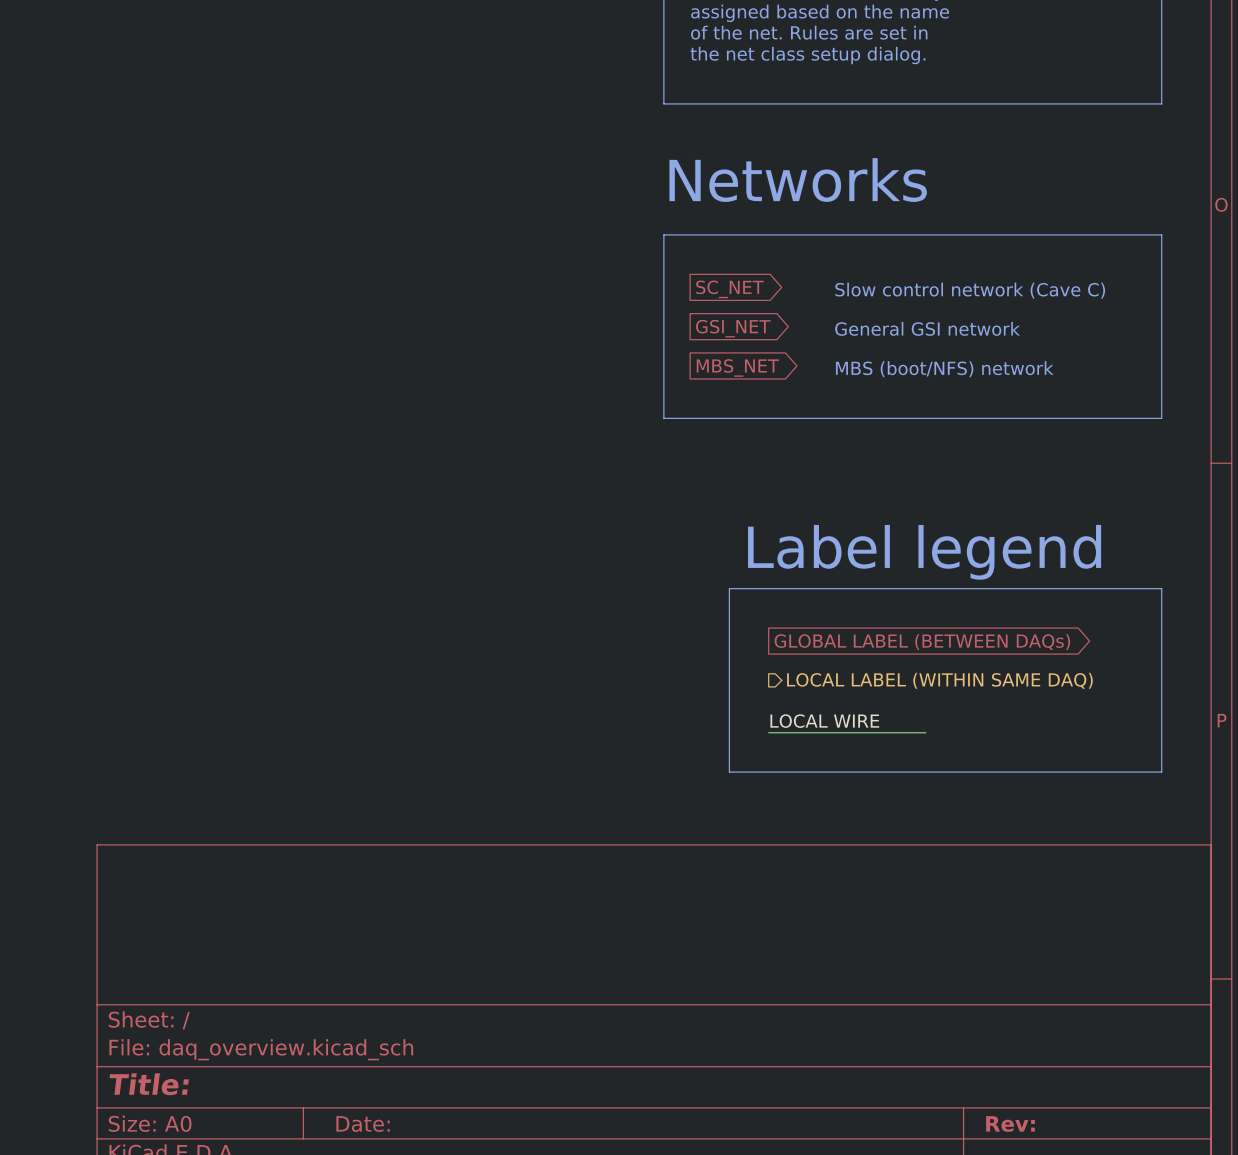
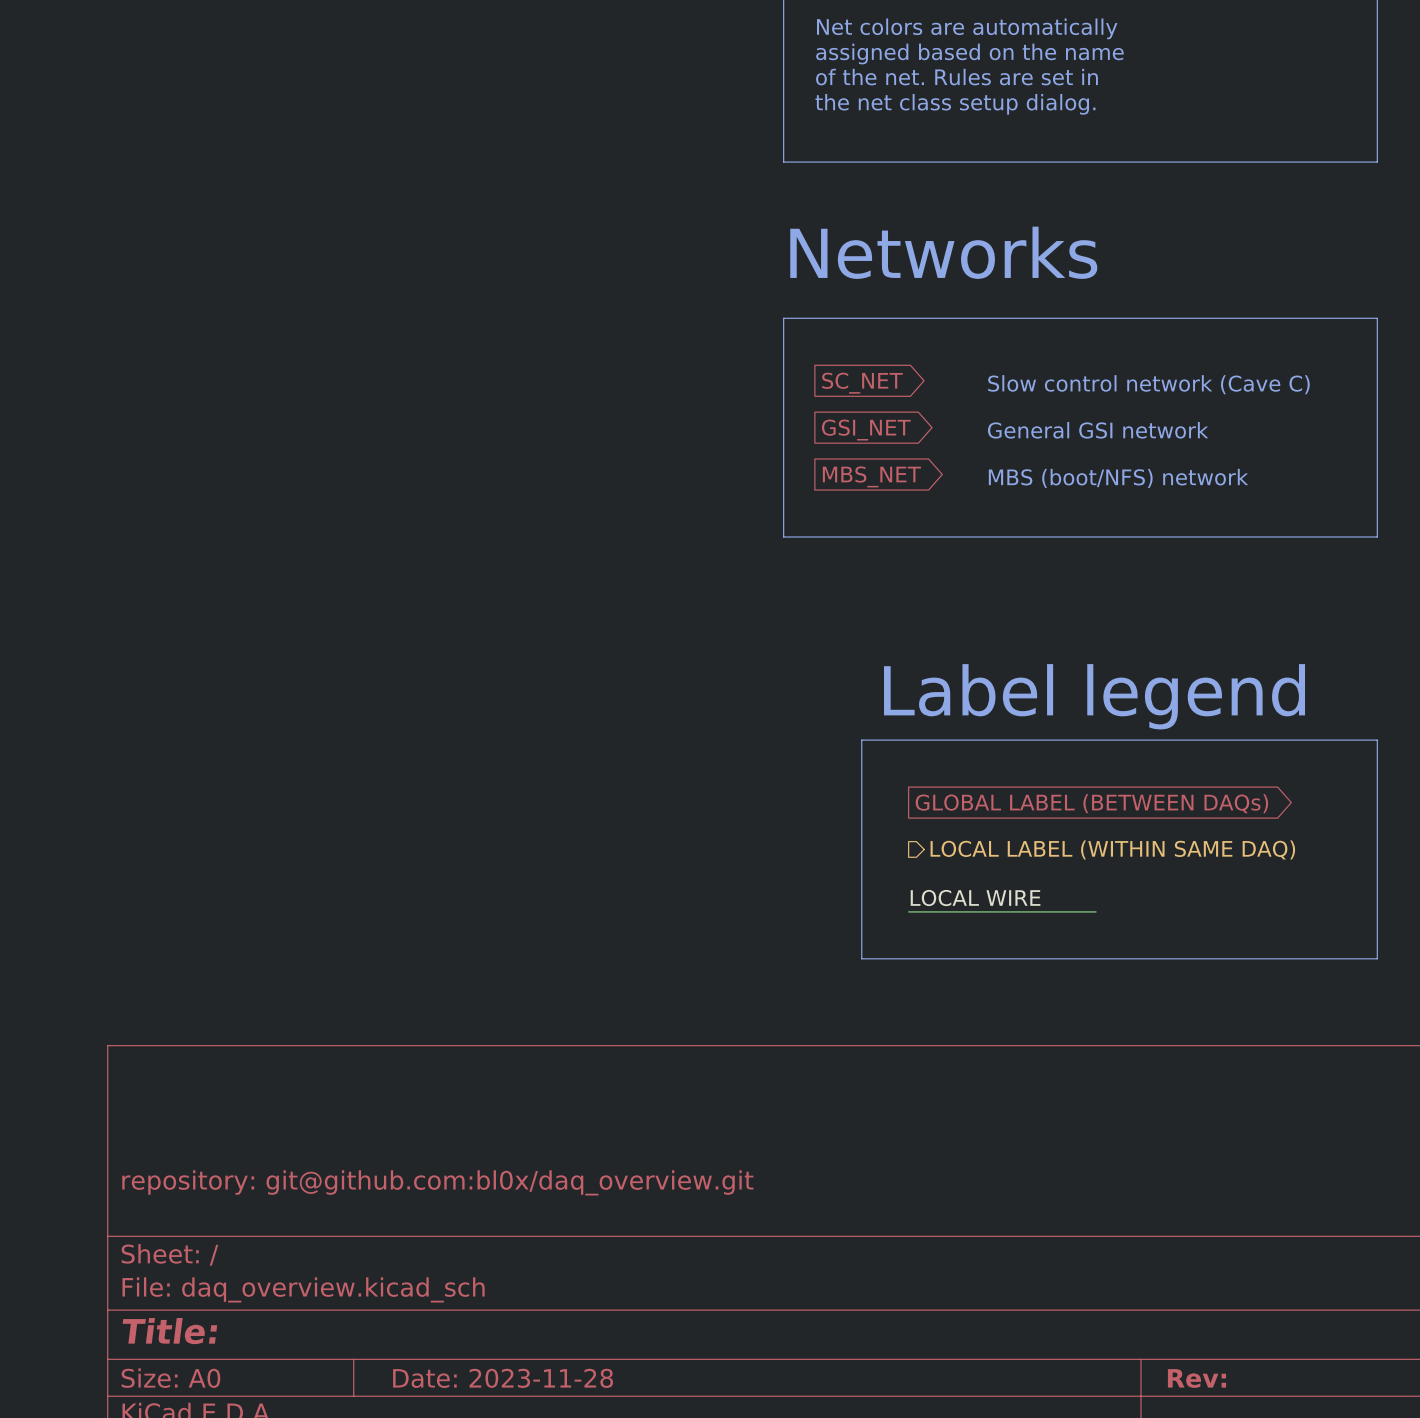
title block: none -> repository: git@github.com:bl0x/daq_overview.git (437, 1182)
title block: Date: (363, 1124) -> Date: 2023-11-28 (503, 1378)

